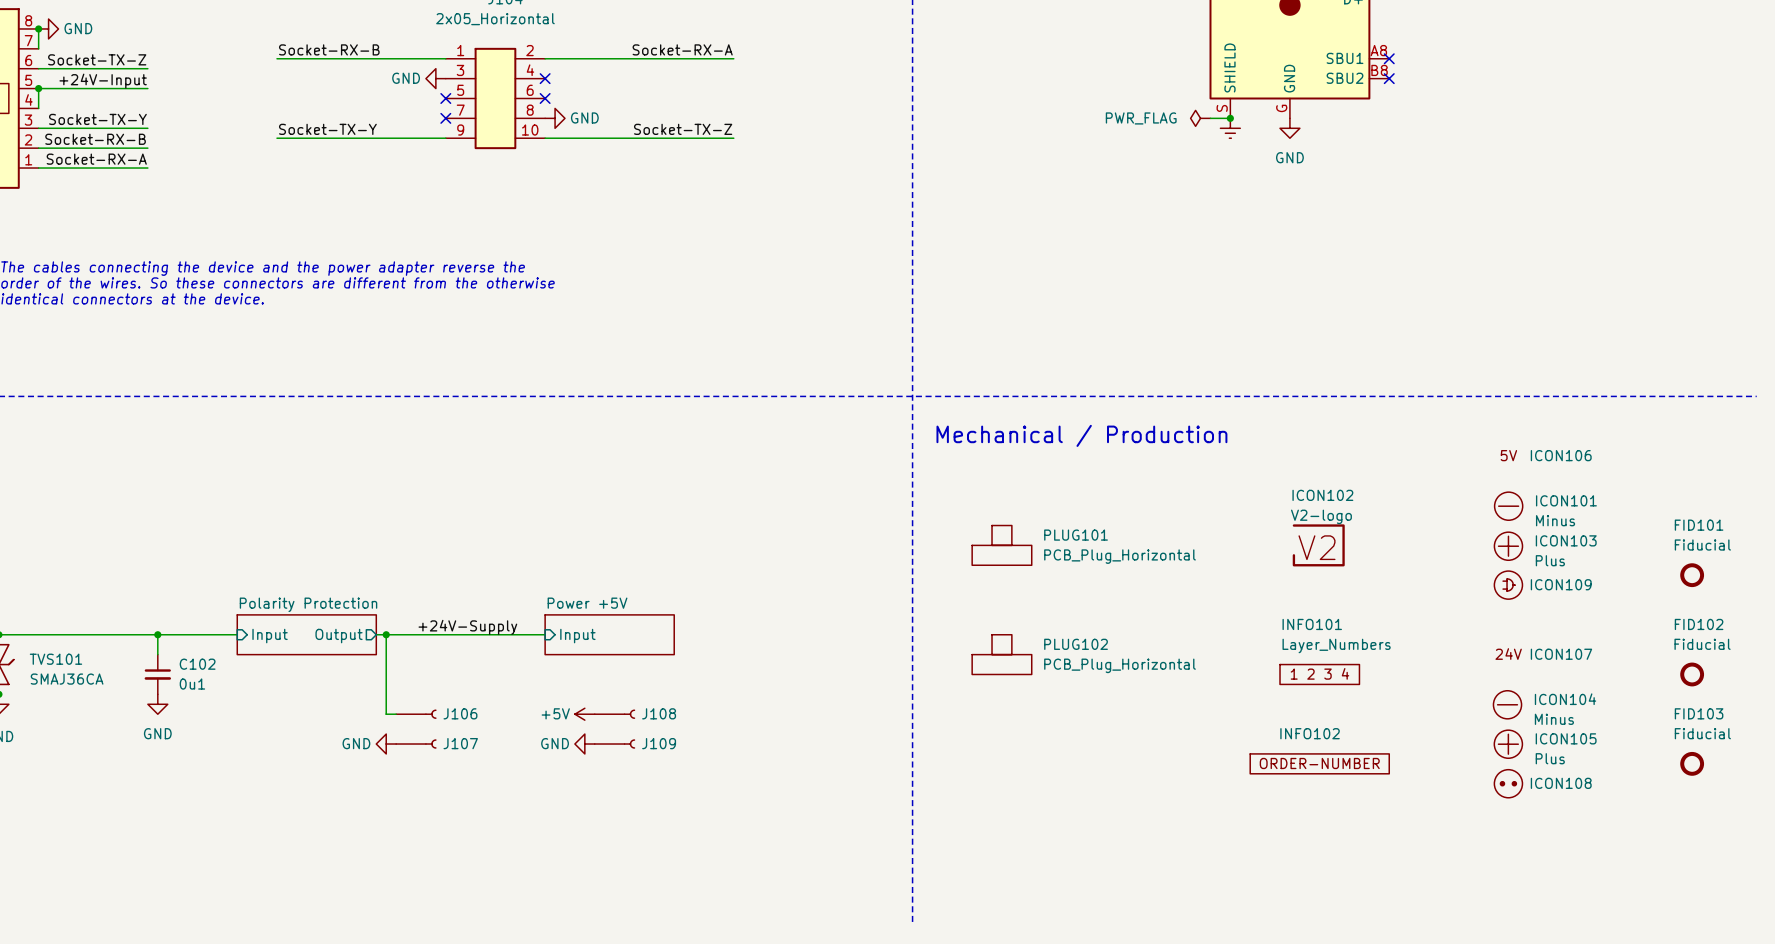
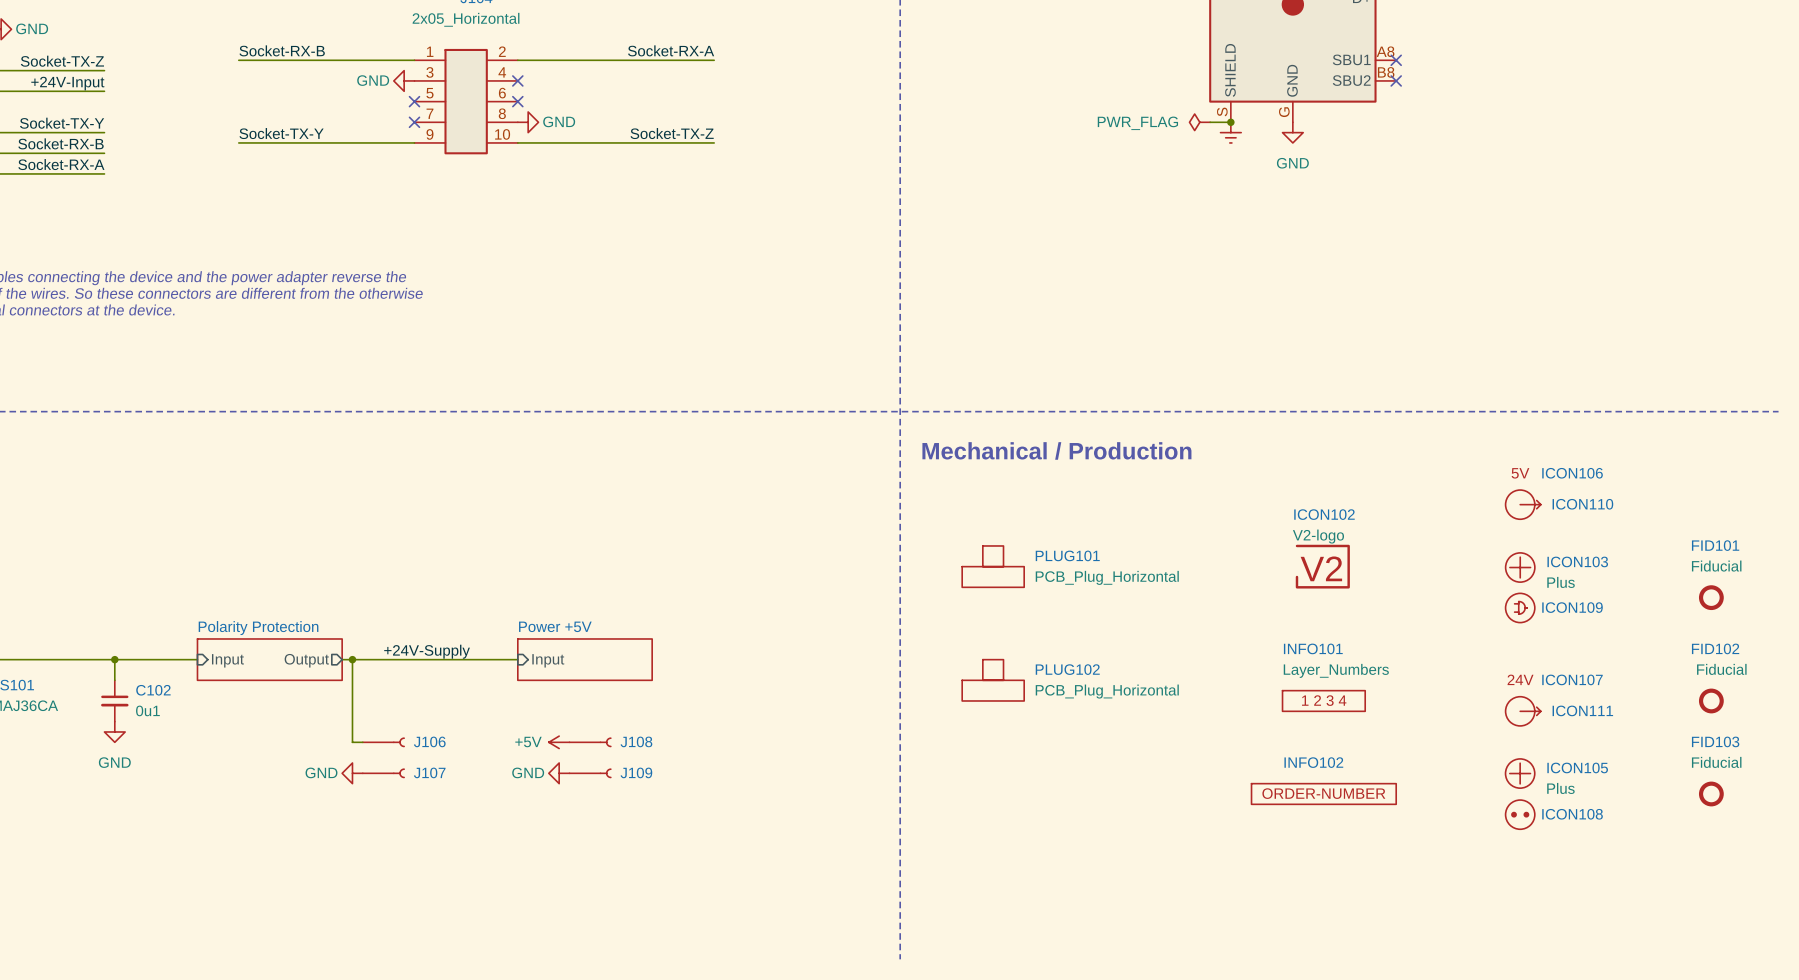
ICON110: none -> (1523, 504)
ICON101: Minus (1508, 506) -> none
ICON111: none -> (1523, 711)
ICON104: Minus (1507, 704) -> none

